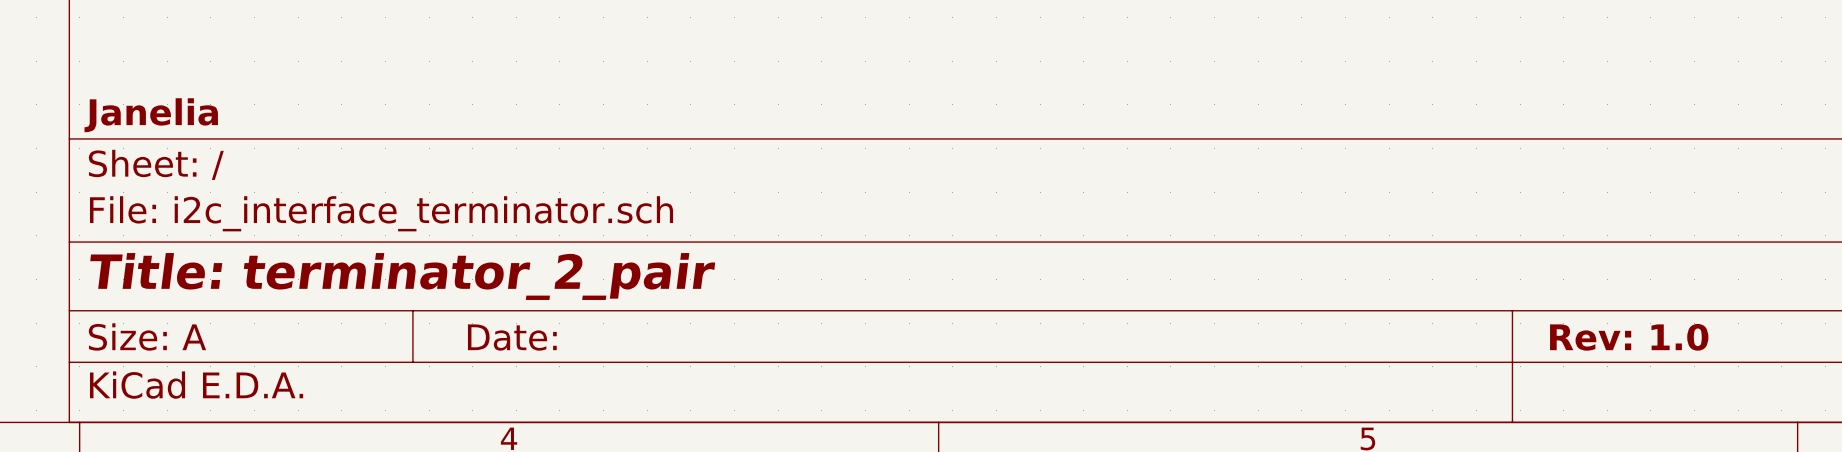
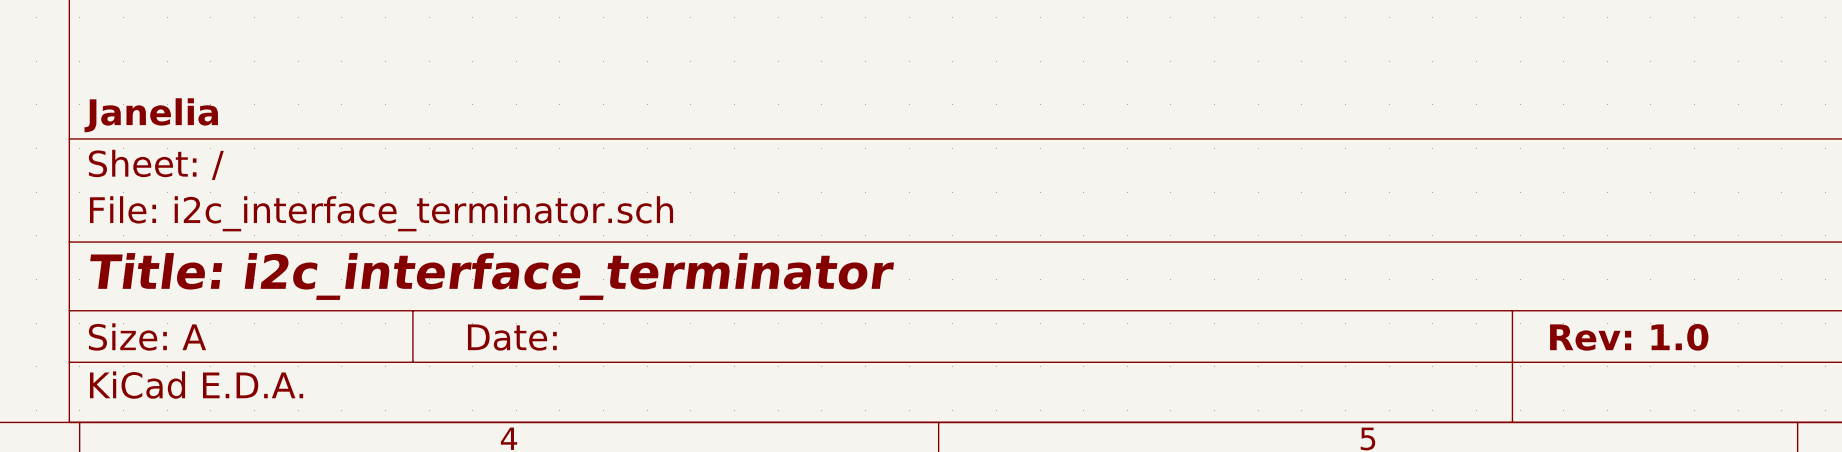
title block: Title: terminator_2_pair (402, 276) -> Title: i2c_interface_terminator (492, 276)

